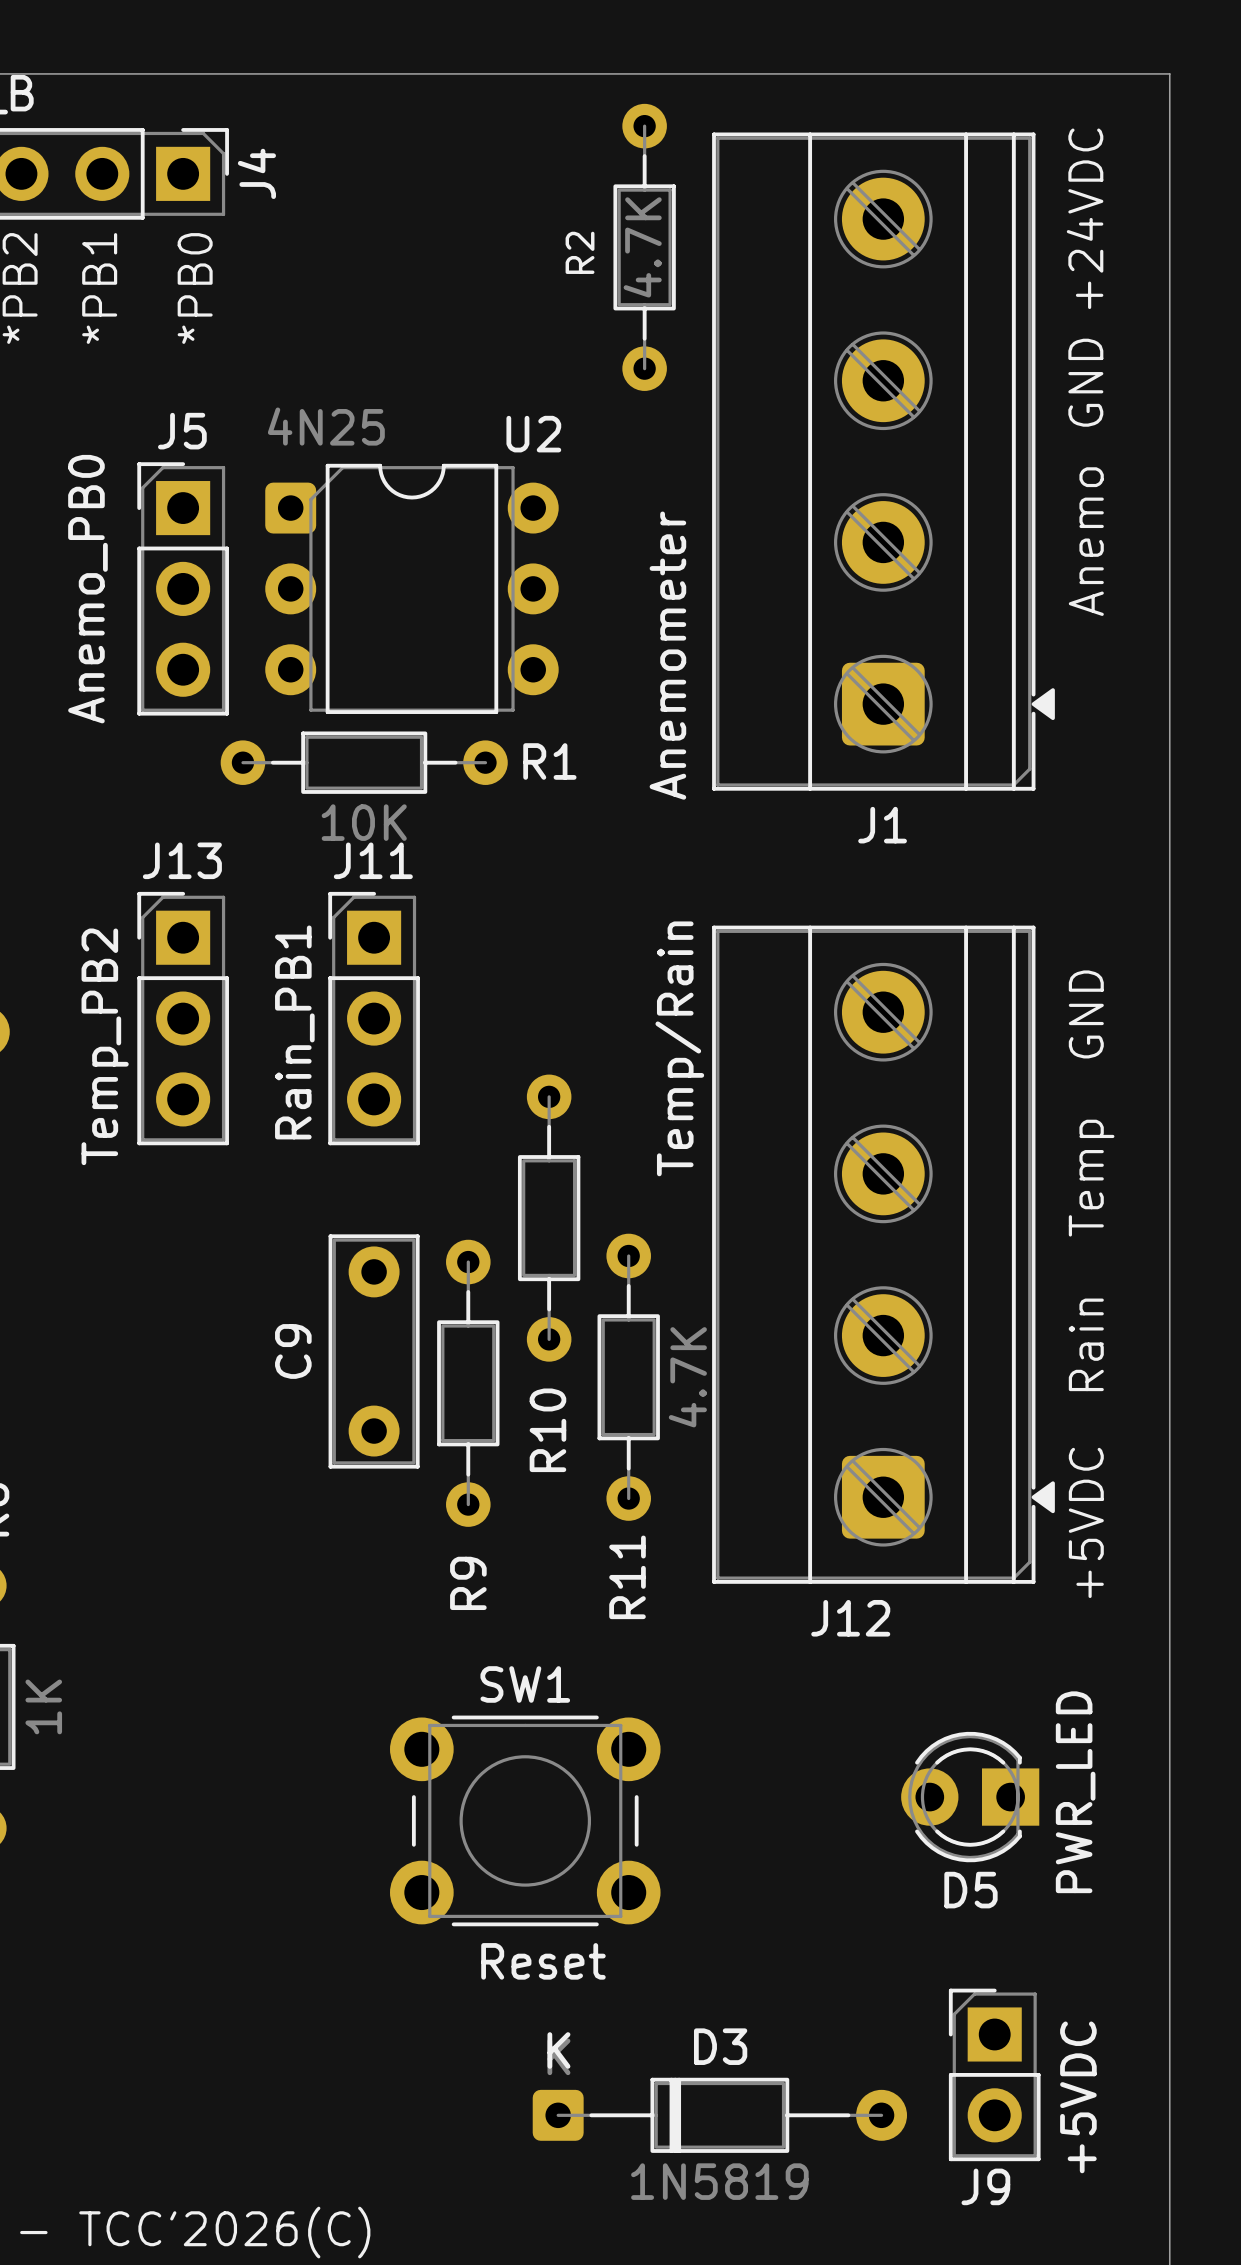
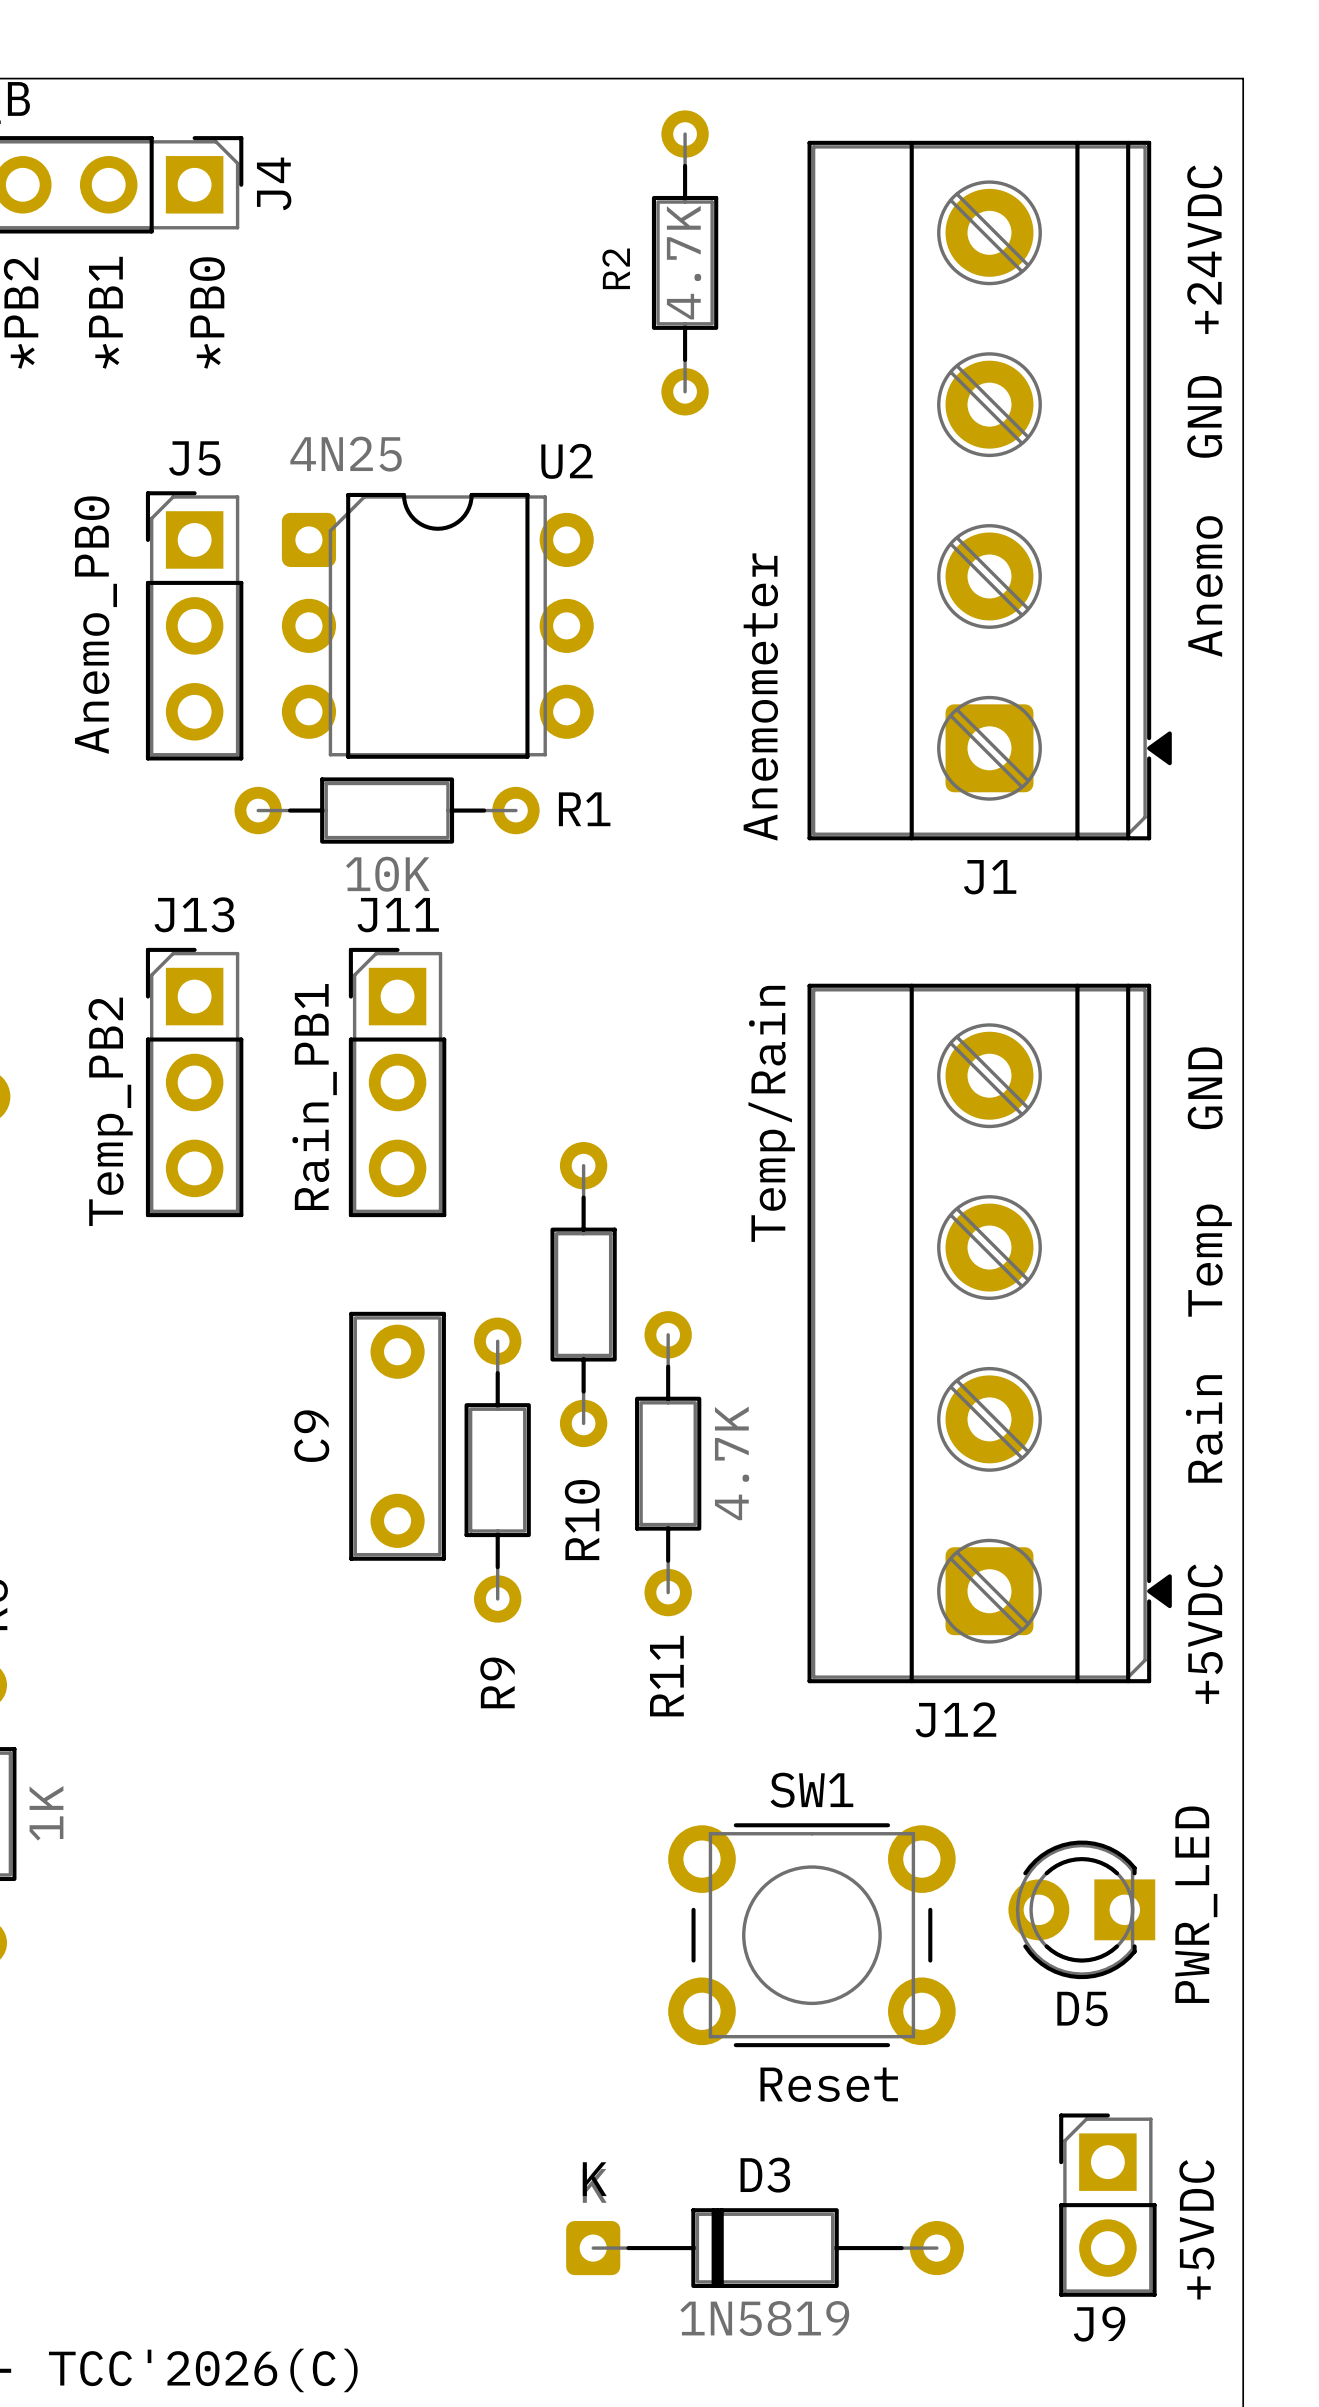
text position: +24VDC (1085, 218) -> +24VDC (1204, 249)
text position: GND (1085, 382) -> GND (1204, 416)
J1 position: (883, 461) -> (989, 490)
text position: Anemo (1086, 541) -> Anemo (1205, 586)
text position: GND (1086, 1014) -> GND (1205, 1088)
text position: Temp (1091, 1178) -> Temp (1210, 1260)
J12 position: (883, 1254) -> (989, 1333)
text position: Rain (1086, 1344) -> Rain (1204, 1428)
text position: +5VDC (1086, 1522) -> +5VDC (1205, 1634)
D5 position: (970, 1797) -> (1081, 1909)
SW1 position: (525, 1820) -> (811, 1935)
J9 position: (994, 2074) -> (1107, 2205)

